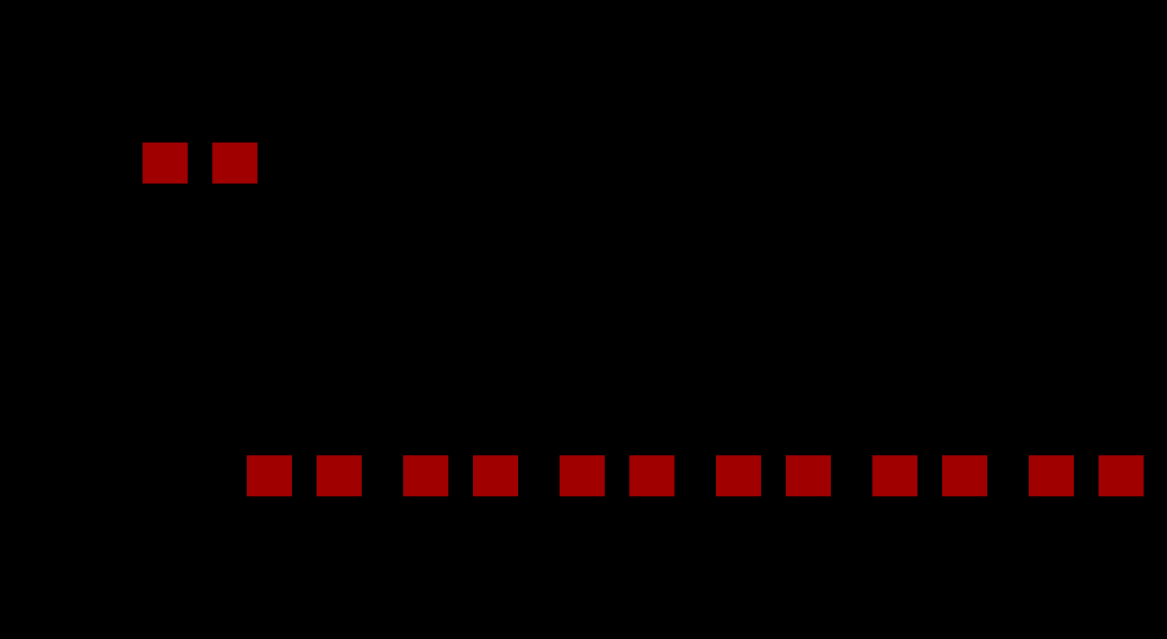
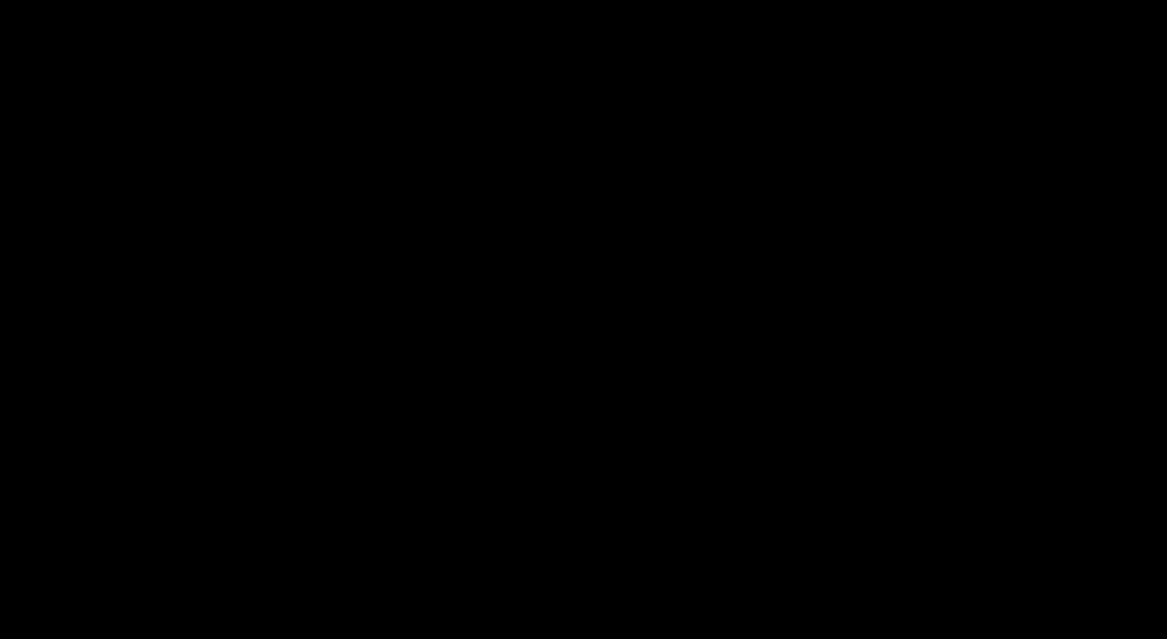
part: (199, 163) -> none
part: (304, 475) -> none
part: (460, 475) -> none
part: (617, 475) -> none
part: (773, 475) -> none
part: (929, 475) -> none
part: (1086, 475) -> none

